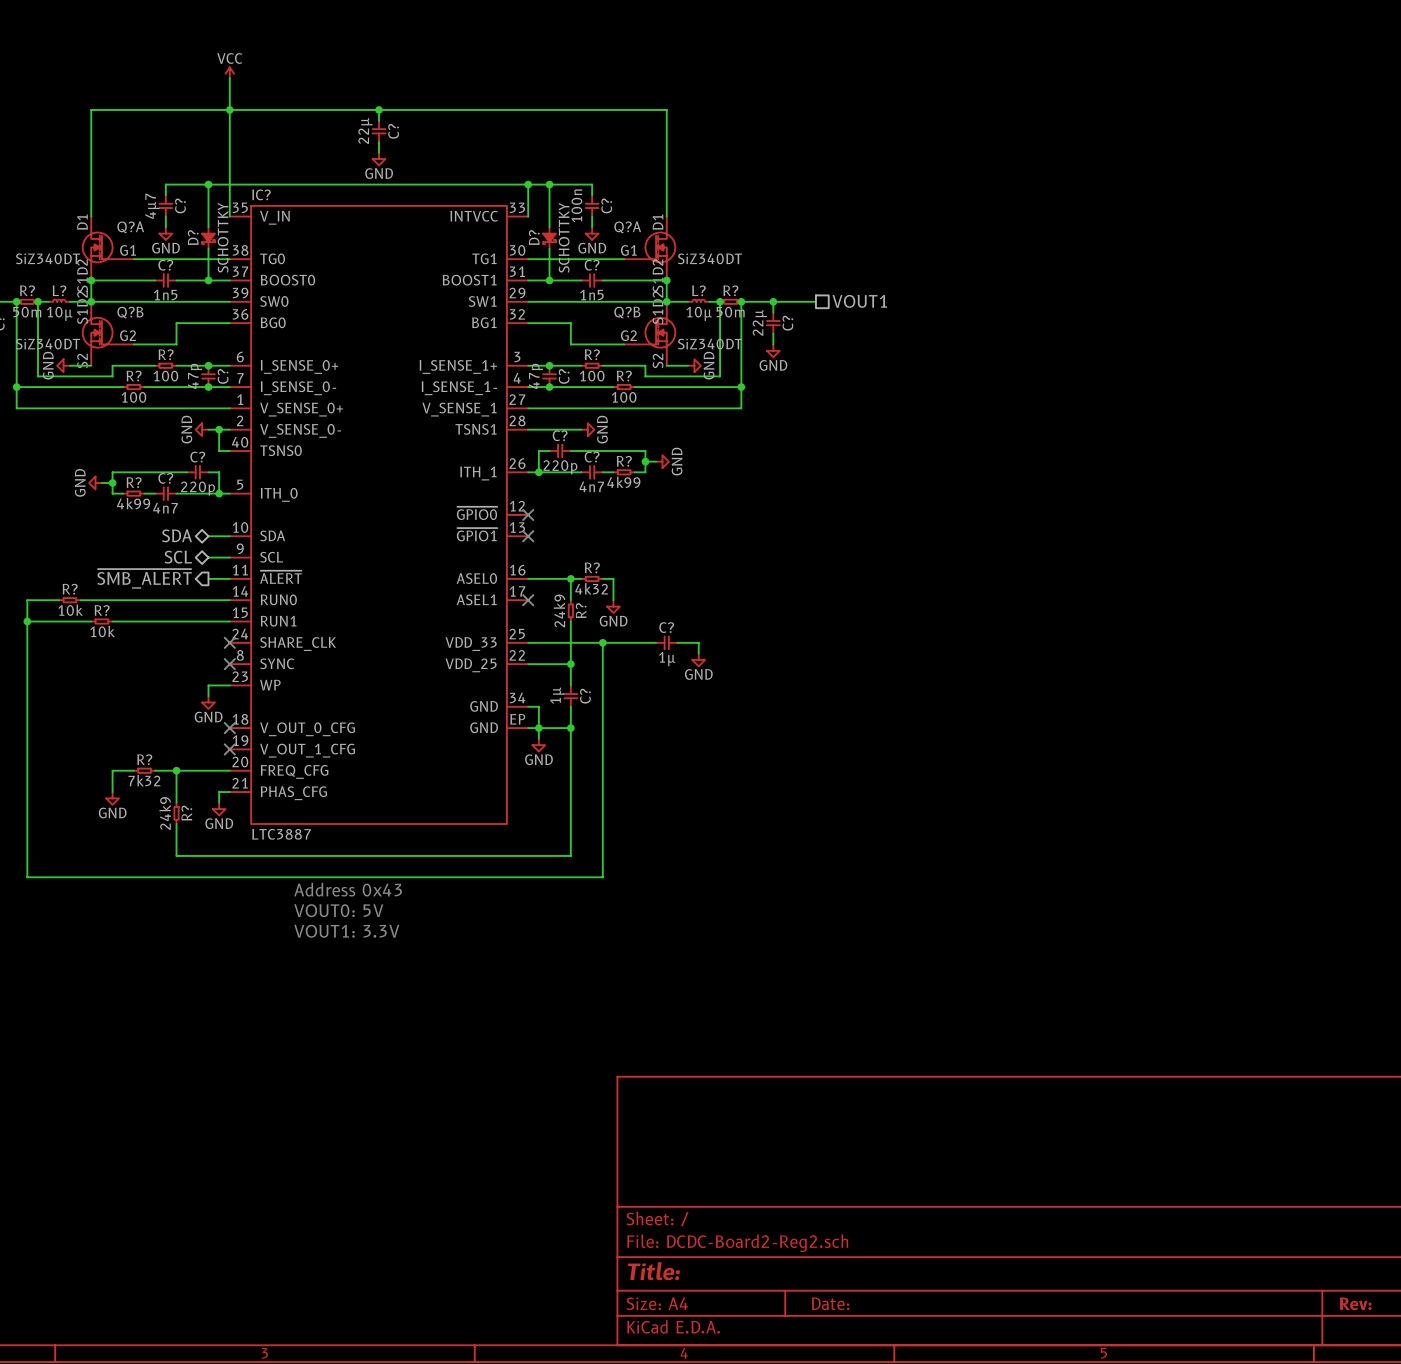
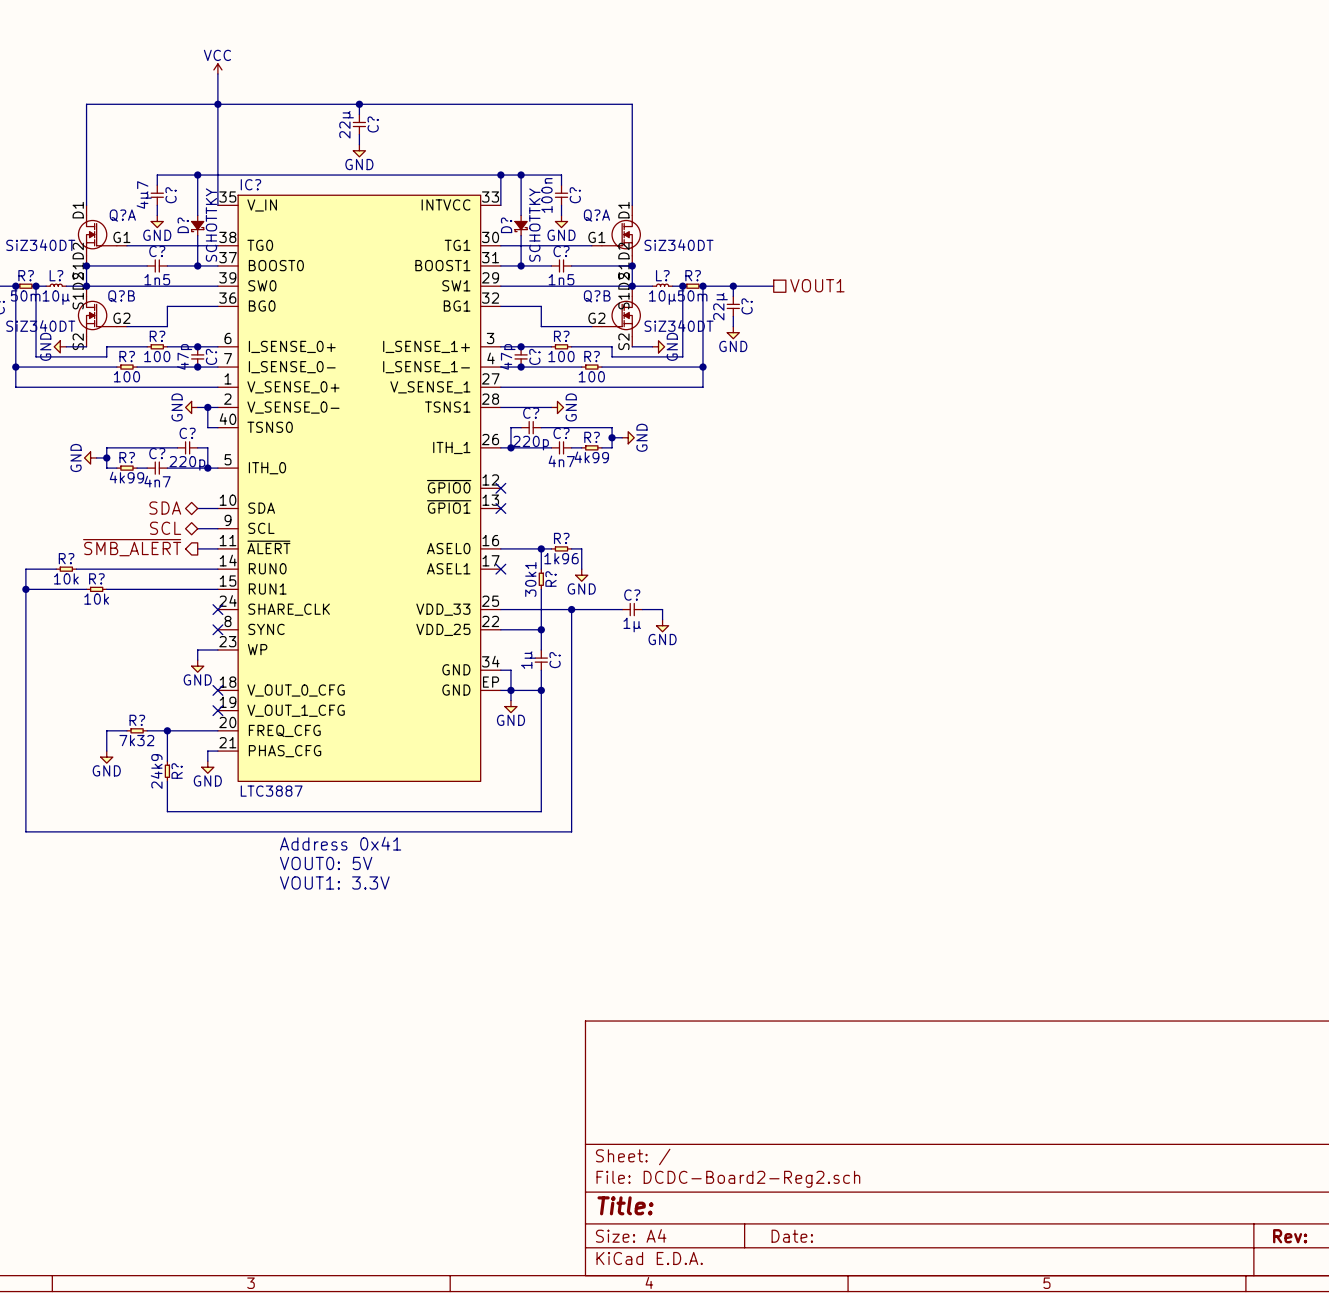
R? value: 4k32 (591, 588) -> 1k96 (561, 558)
R? value: 24k9 (559, 610) -> 30k1 (530, 579)
text: Address 0x43 (348, 889) -> Address 0x41 (340, 843)

